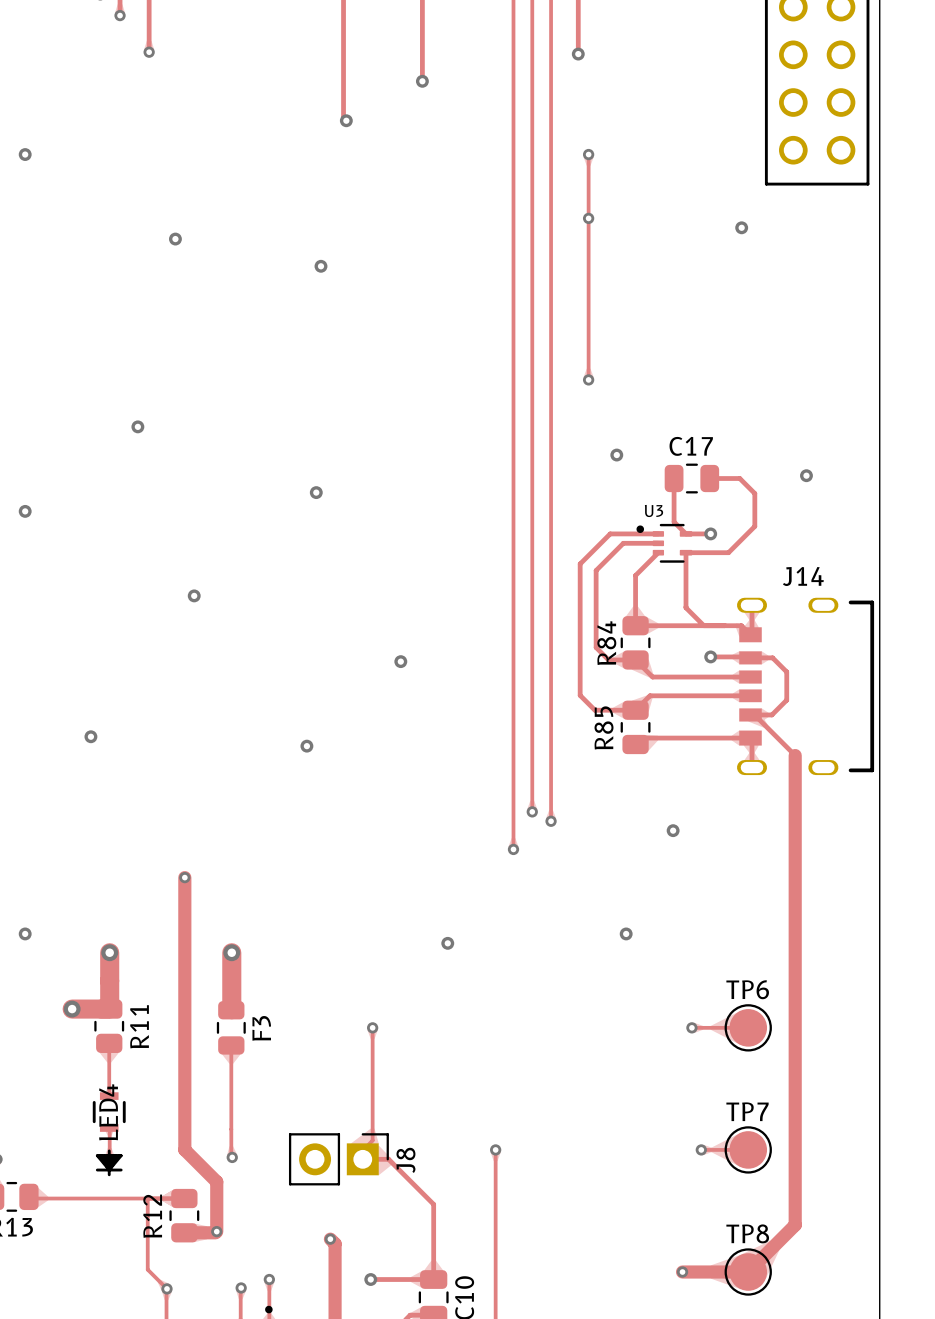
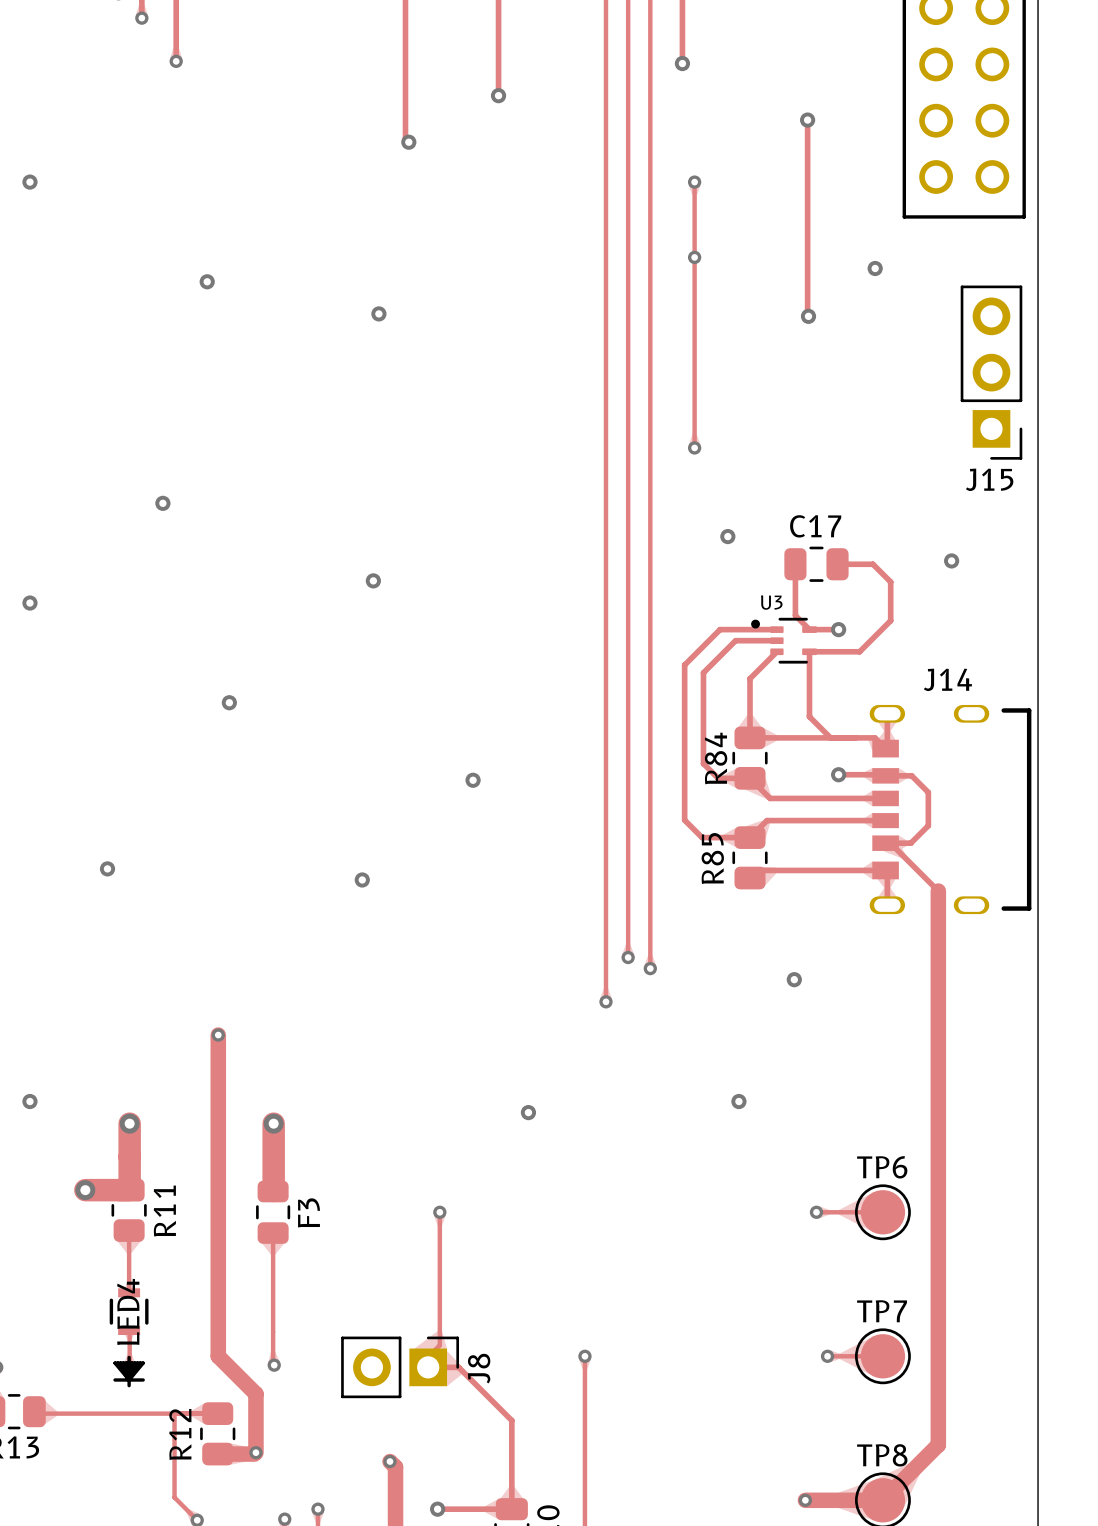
track: none -> (807, 120) (808, 316)
via: none -> (807, 120)
via: none -> (808, 316)
J15: none -> (991, 372)

